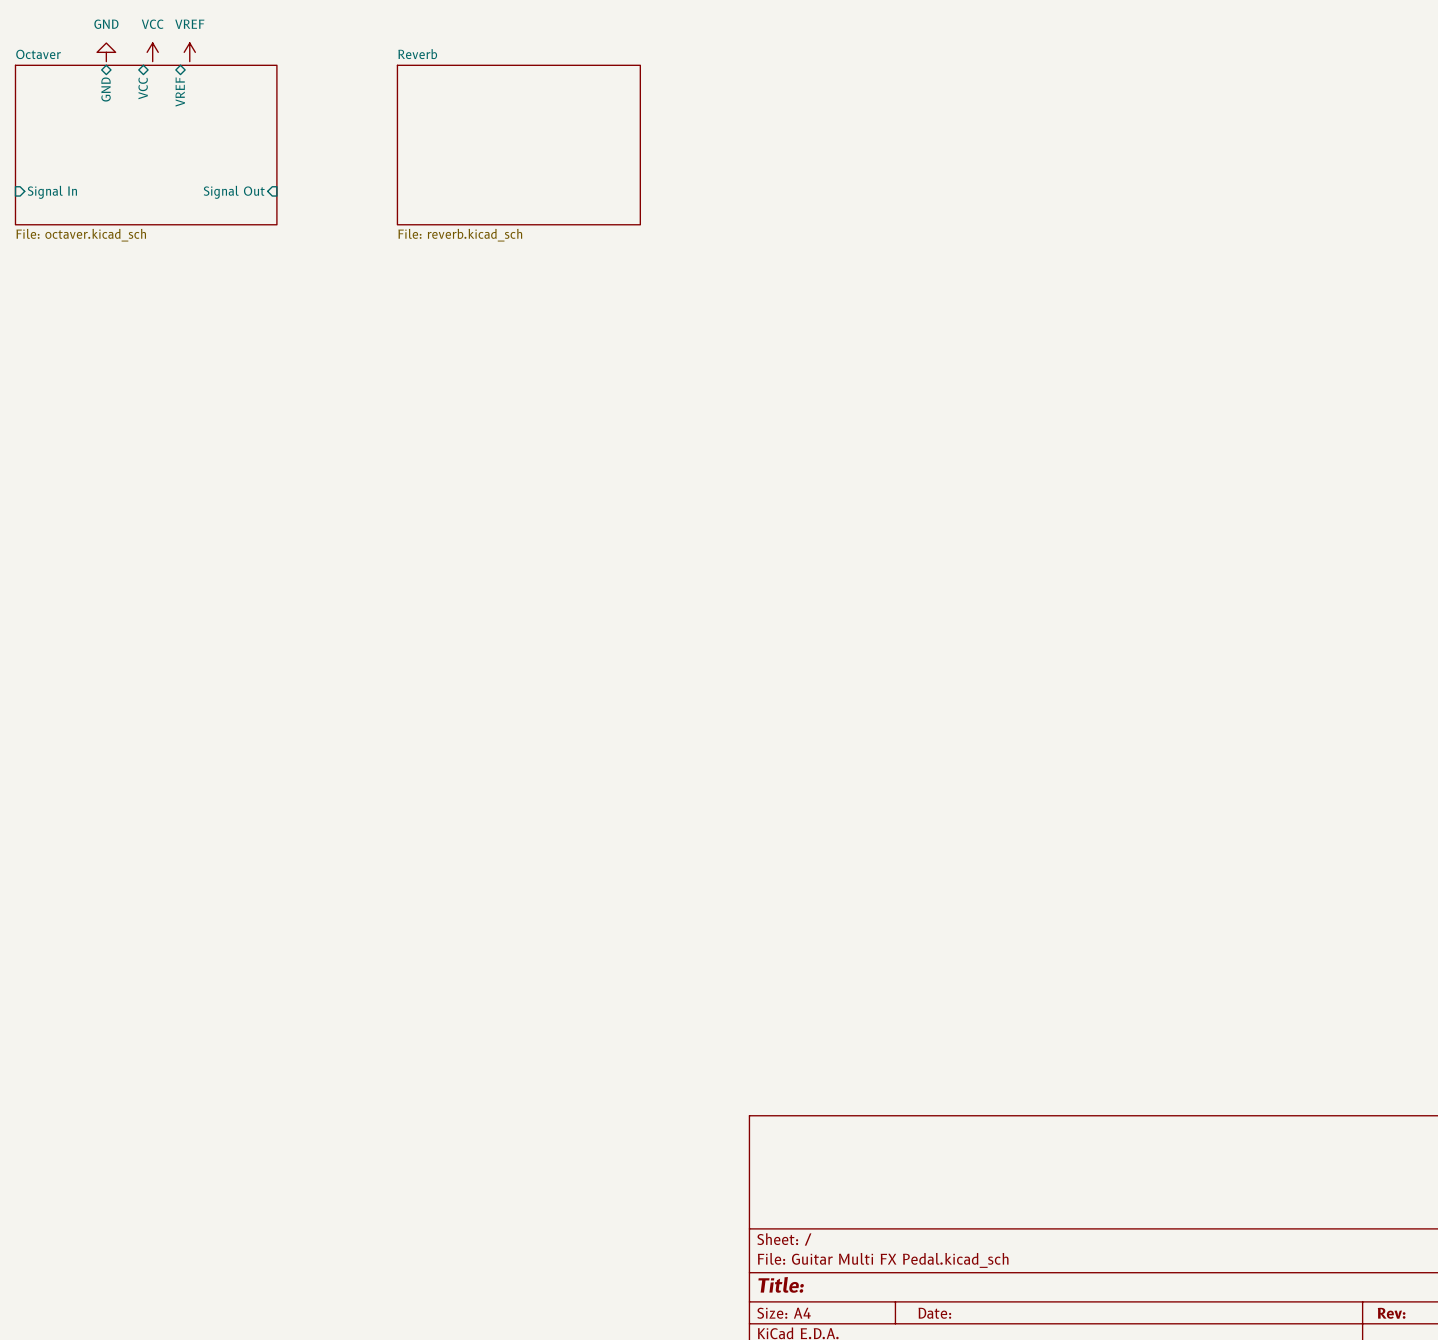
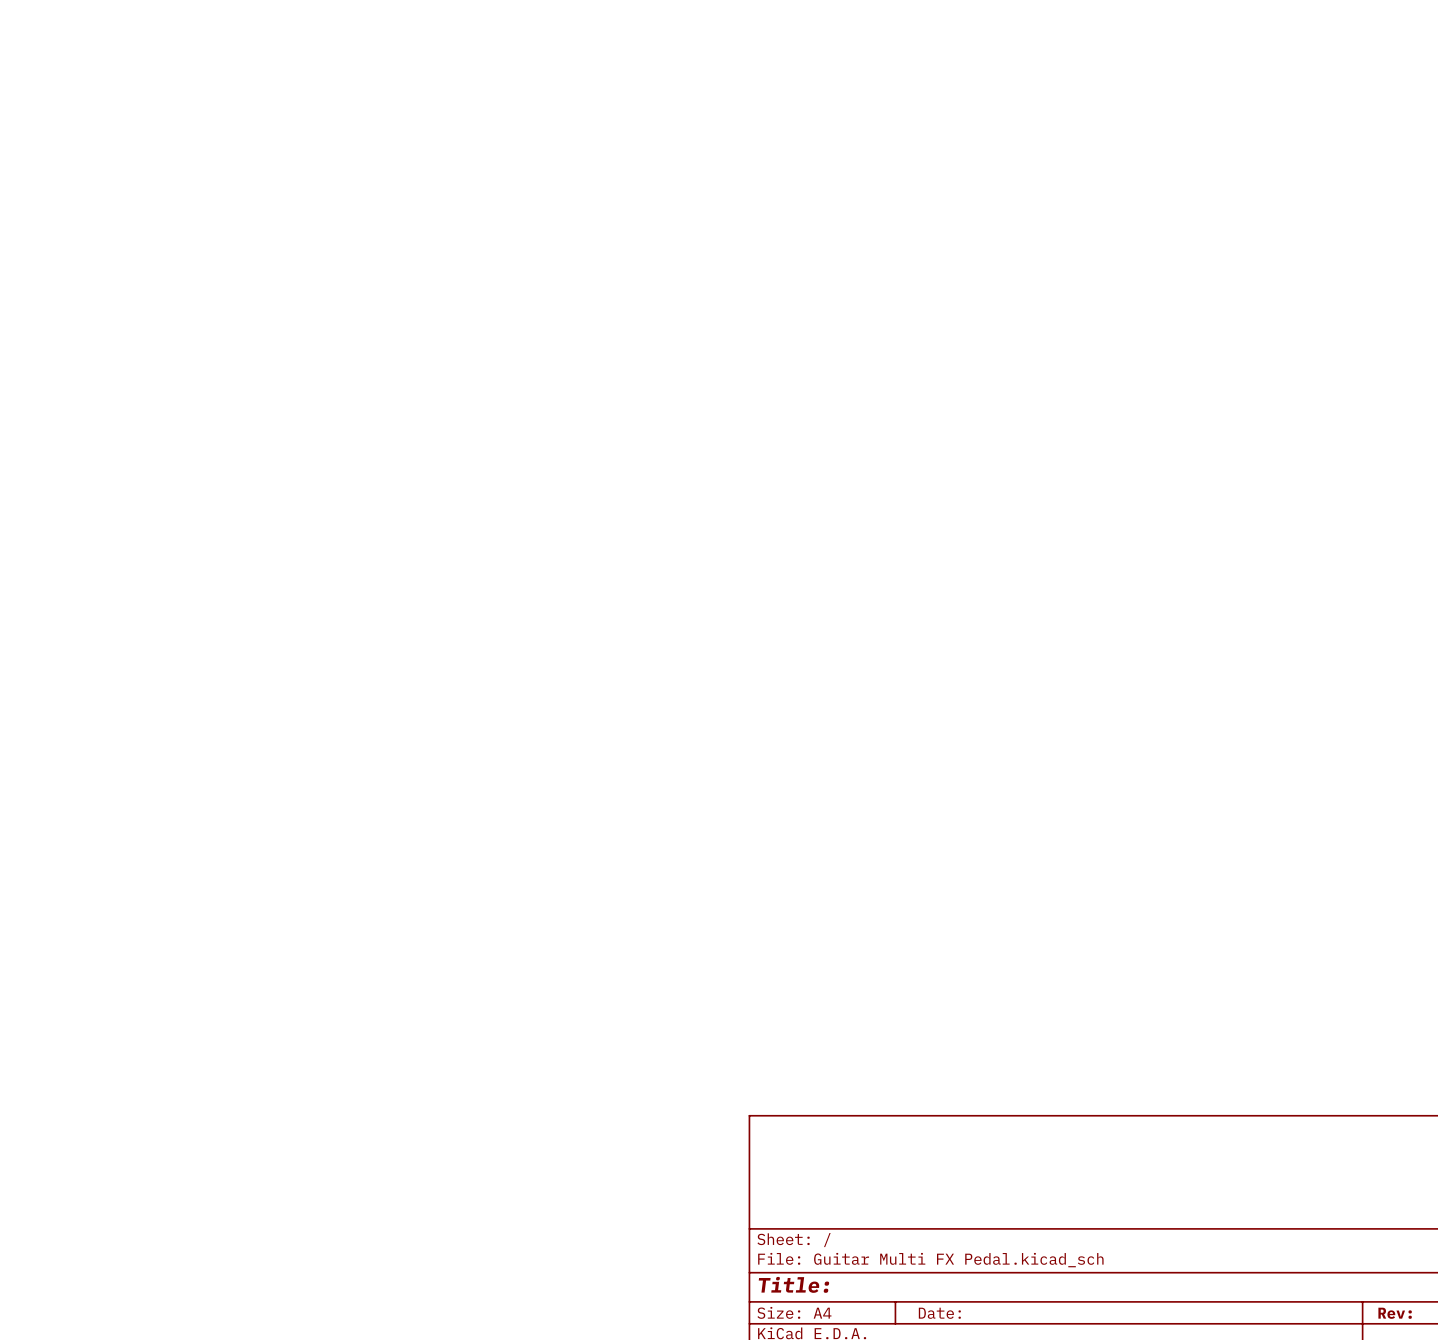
power symbol: GND (106, 52) -> none
power symbol: VCC (152, 52) -> none
power symbol: VREF (189, 52) -> none
sheet pin: VCC (143, 88) -> none
sheet pin: GND (106, 89) -> none
sheet pin: VREF (180, 91) -> none
sheet Octaver: File: octaver.kicad_sch (146, 145) -> none
sheet Reverb: File: reverb.kicad_sch (518, 145) -> none
sheet pin: Signal In (52, 192) -> none
sheet pin: Signal Out (234, 192) -> none

